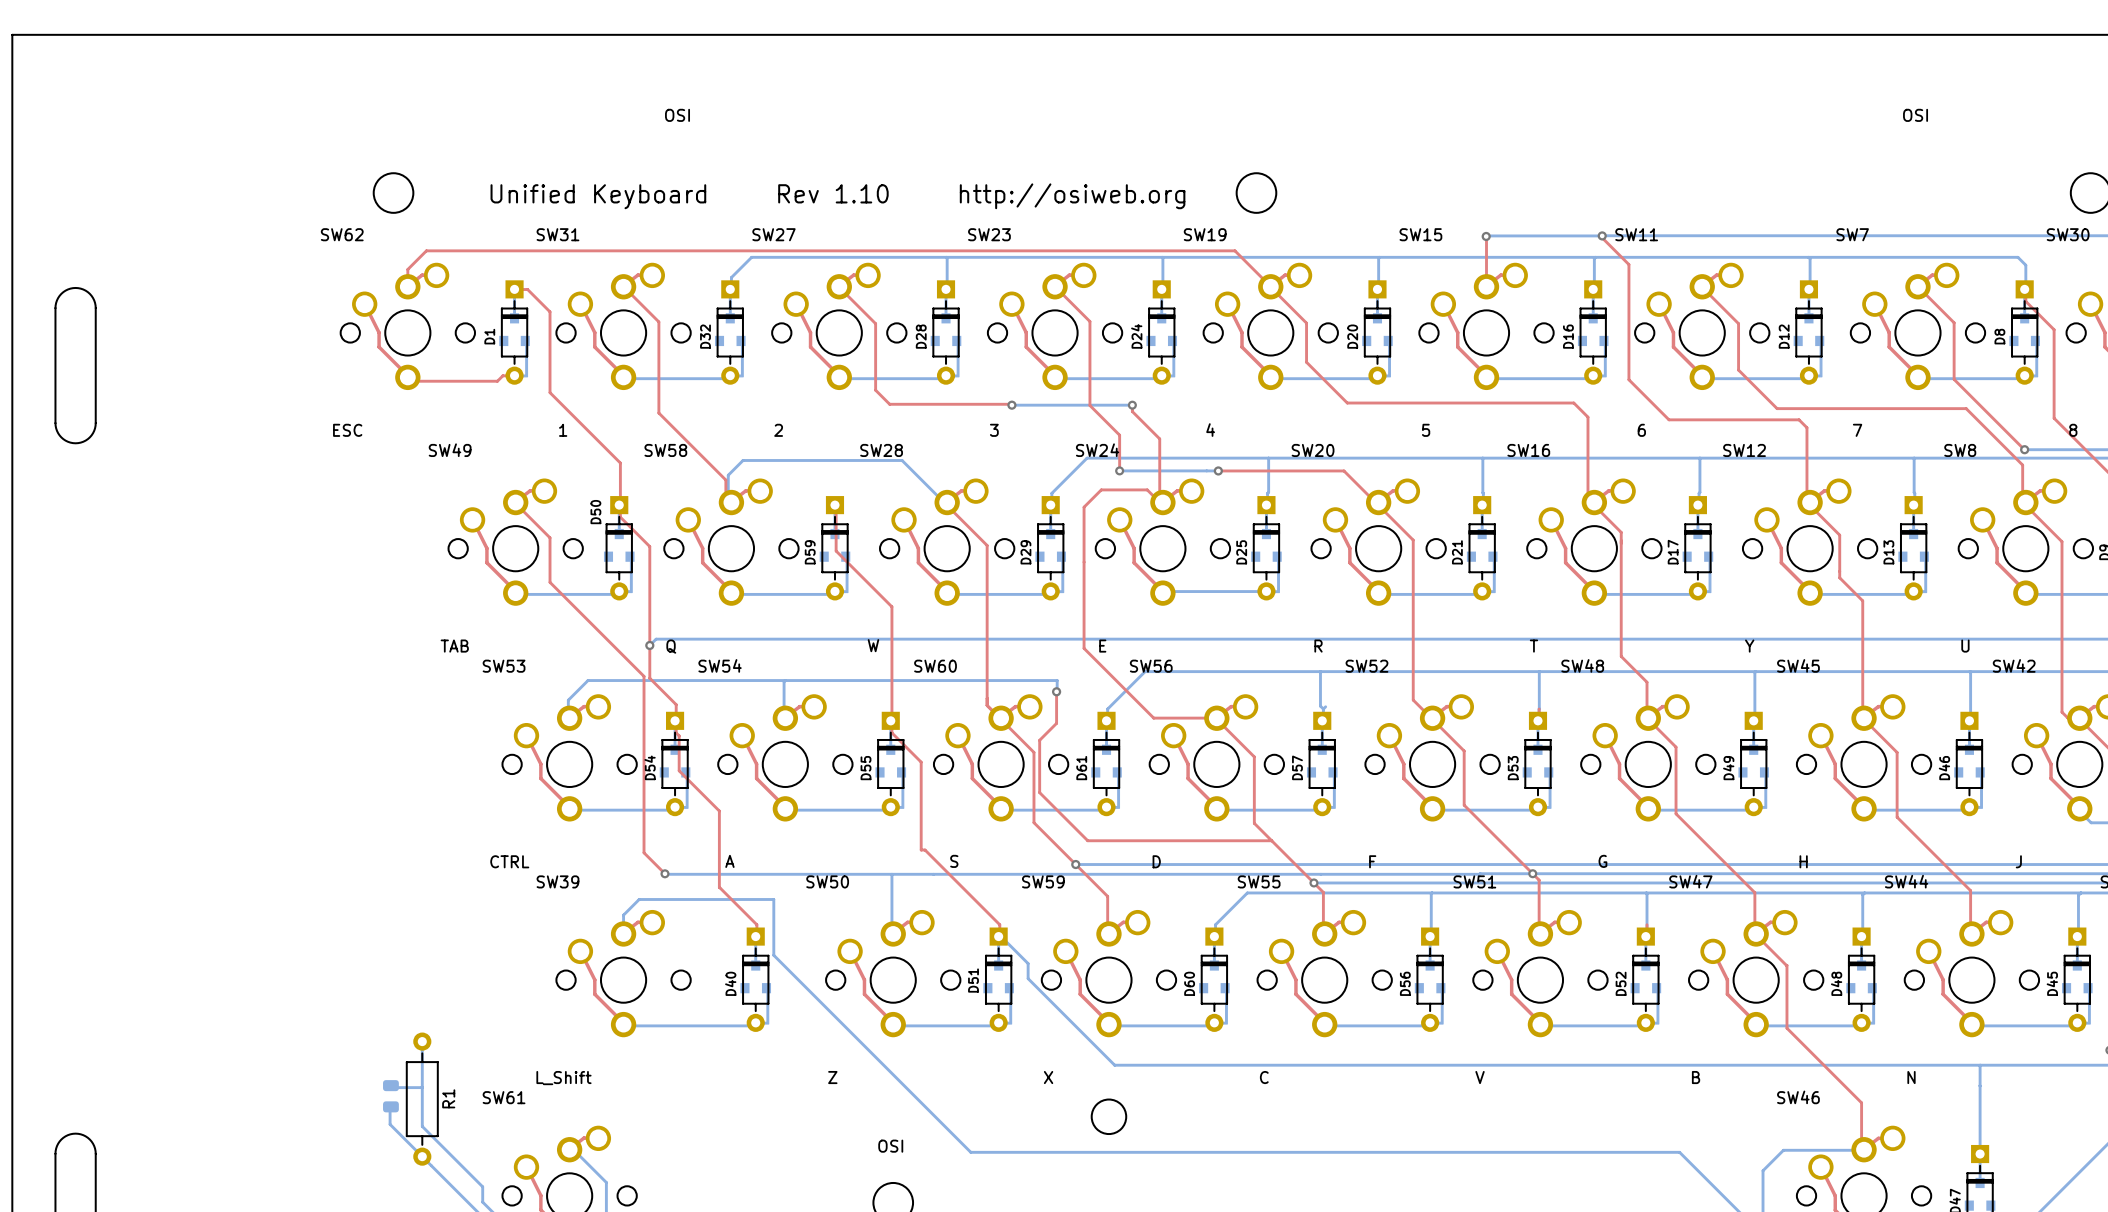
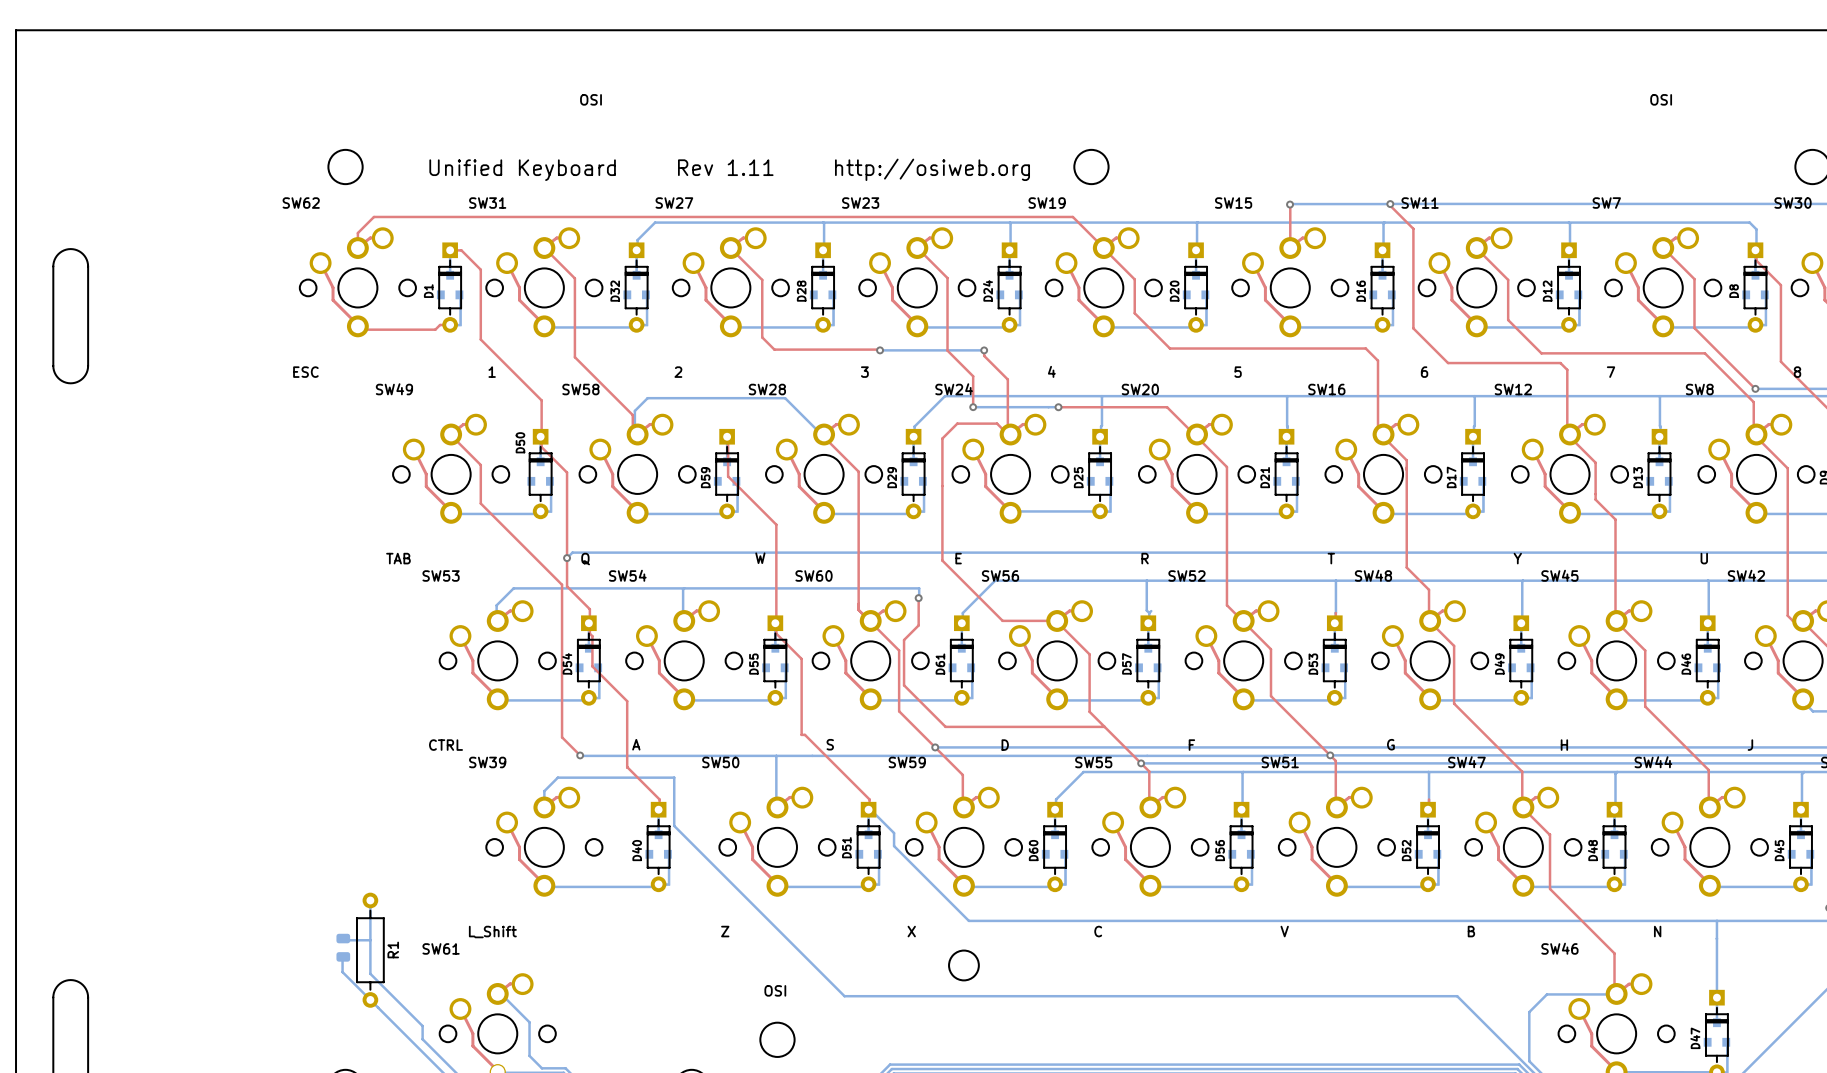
text: Unified Keyboard Rev 1.10 http://osiweb.org (837, 196) -> Unified Keyboard Rev 1.11 http://osiweb.org (729, 169)

